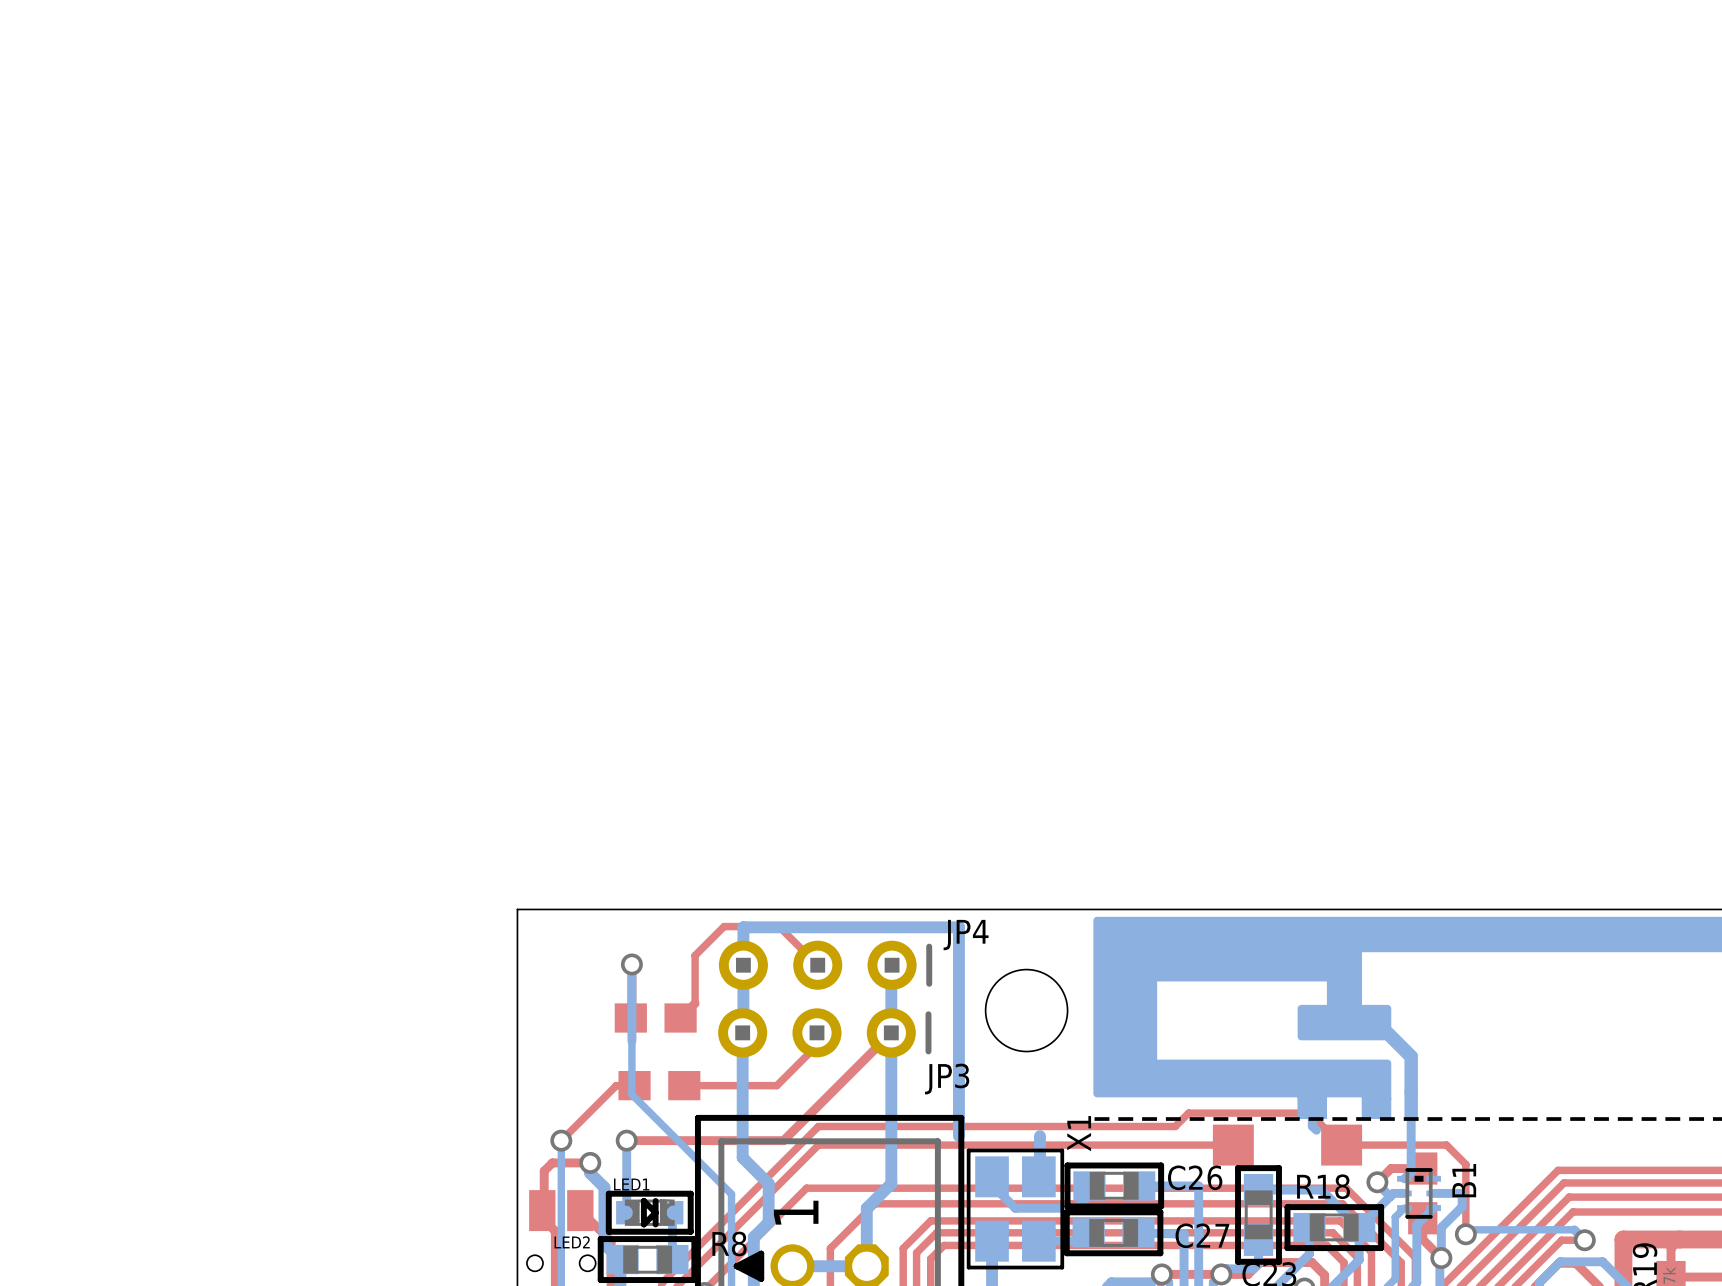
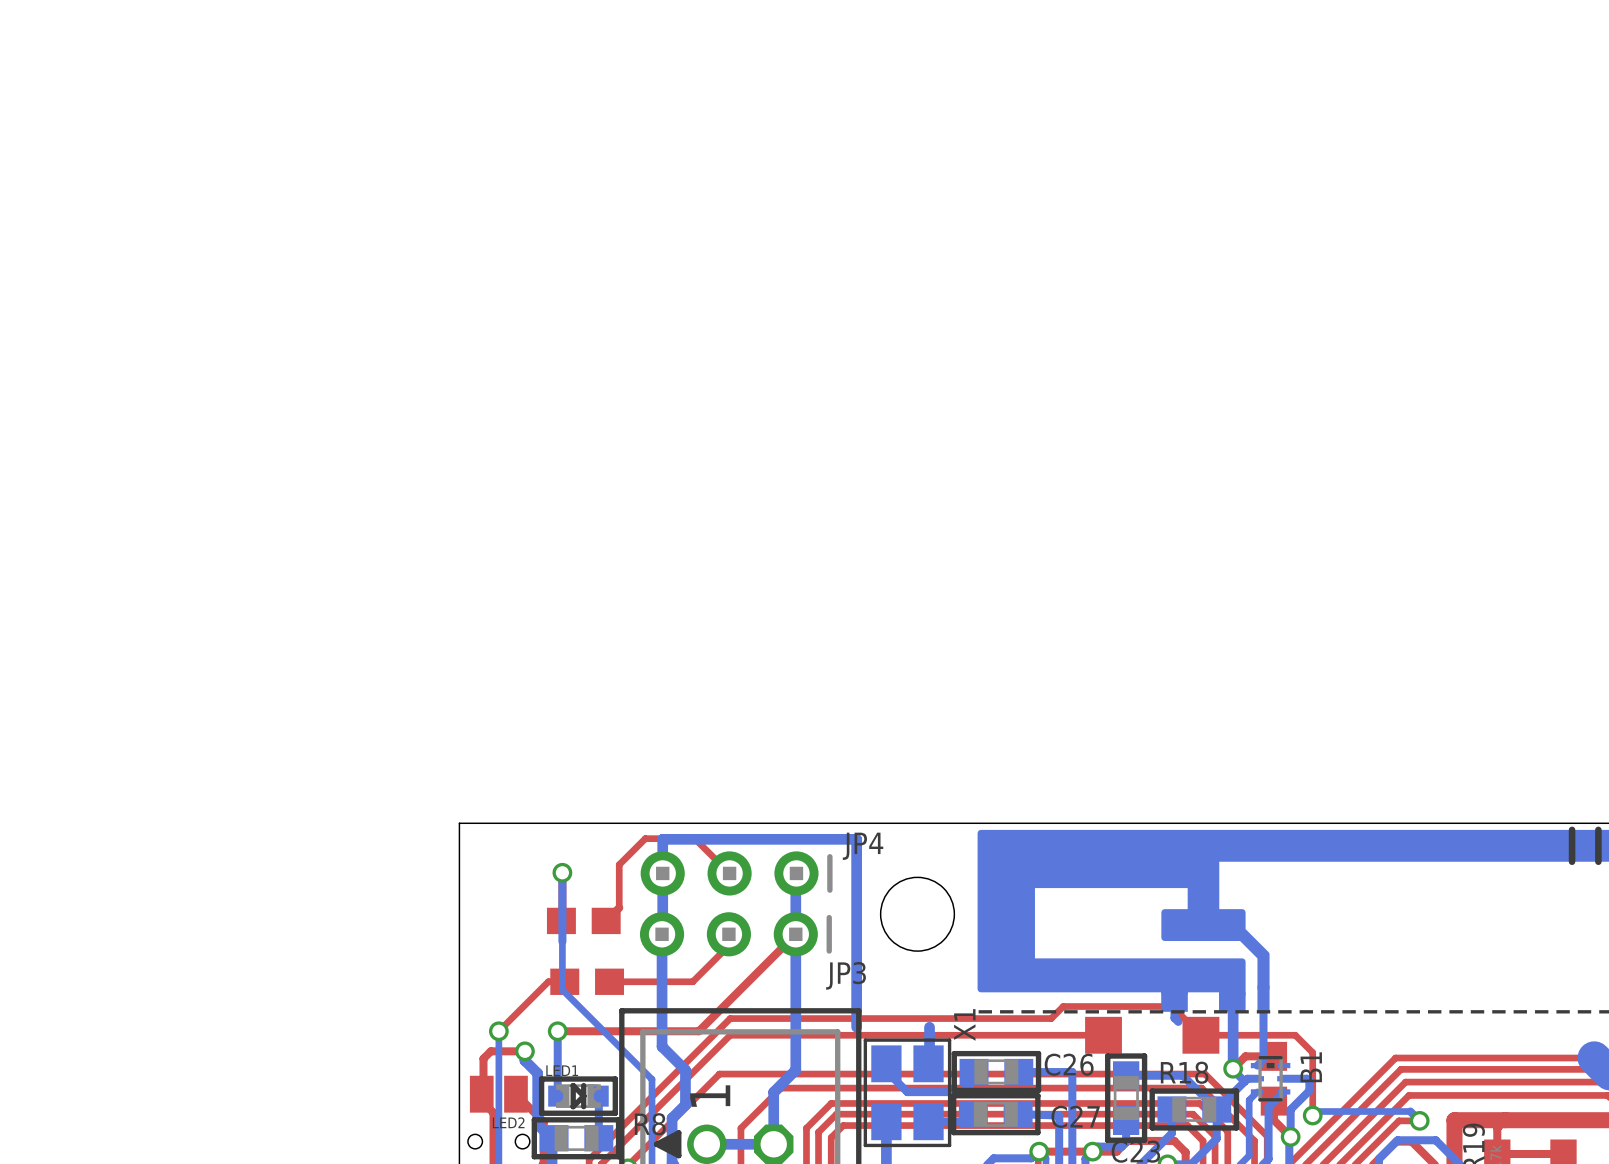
bottom track: none -> (1232, 1002) (1233, 1069)

